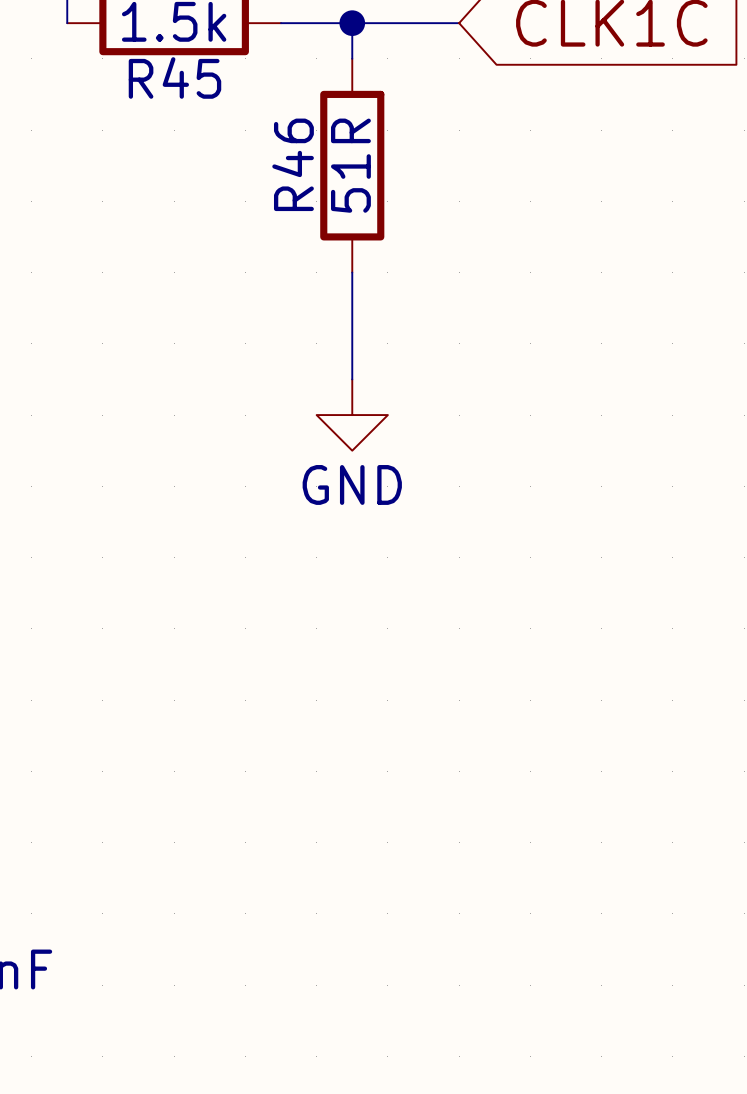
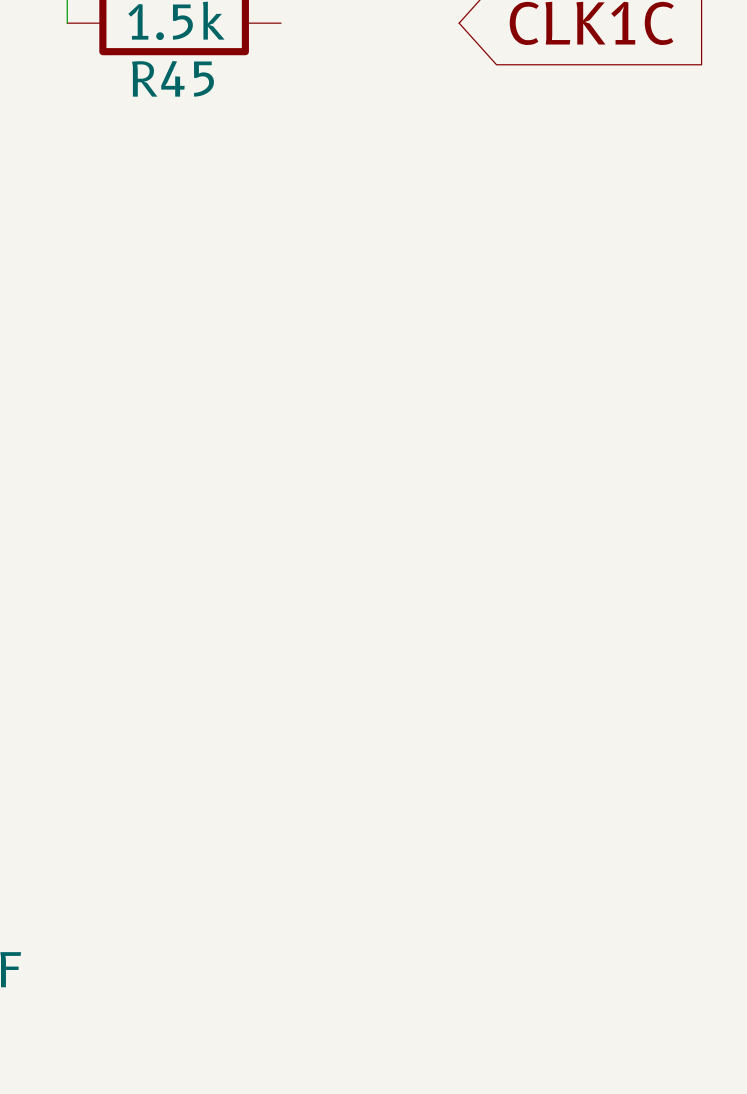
wire: (281, 23) (459, 23) -> none
wire: (352, 23) (352, 58) -> none
junction: (352, 23) -> none
R46: 51R (352, 165) -> none
wire: (352, 272) (352, 379) -> none
power symbol: GND (352, 415) -> none

